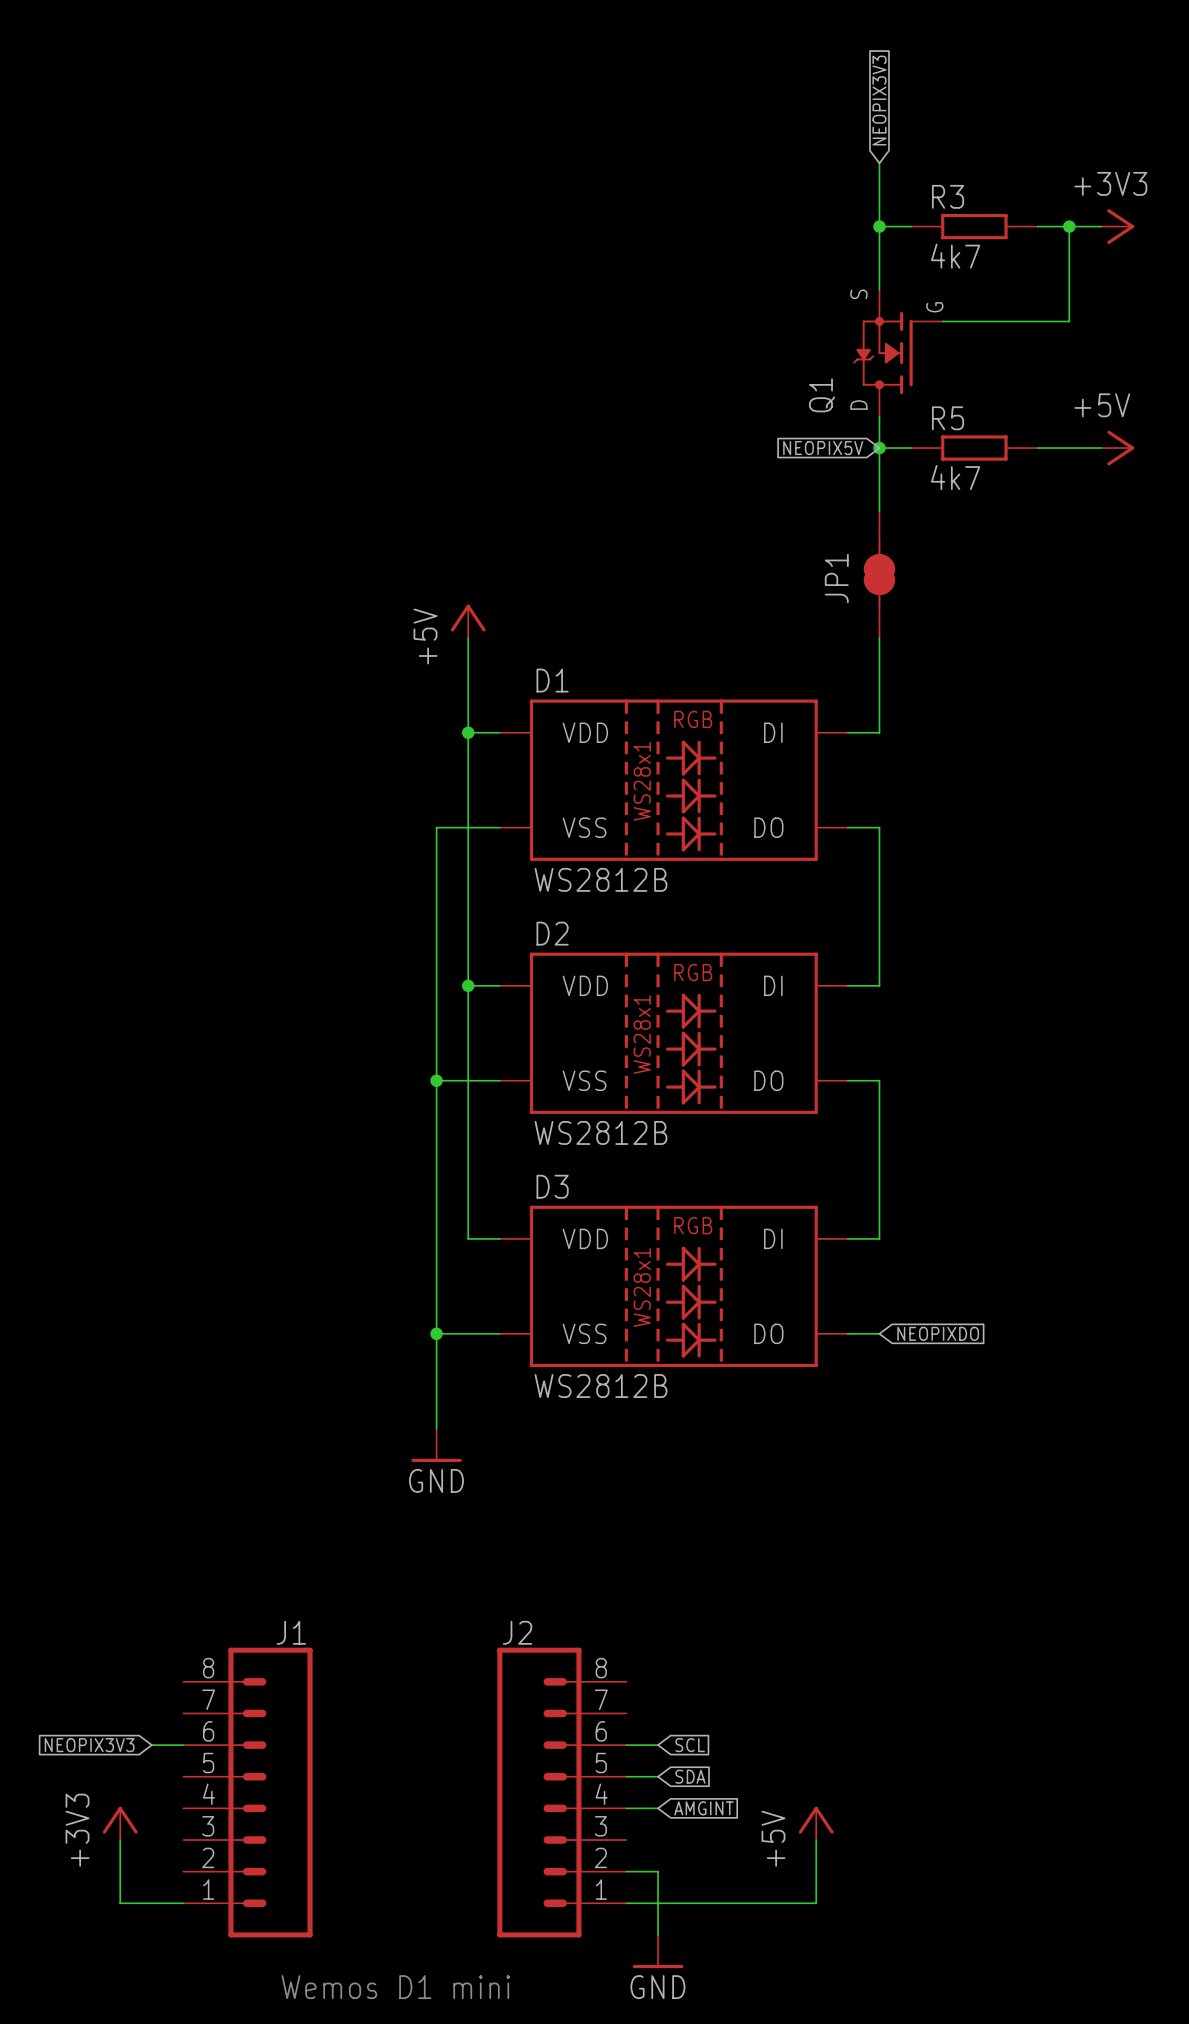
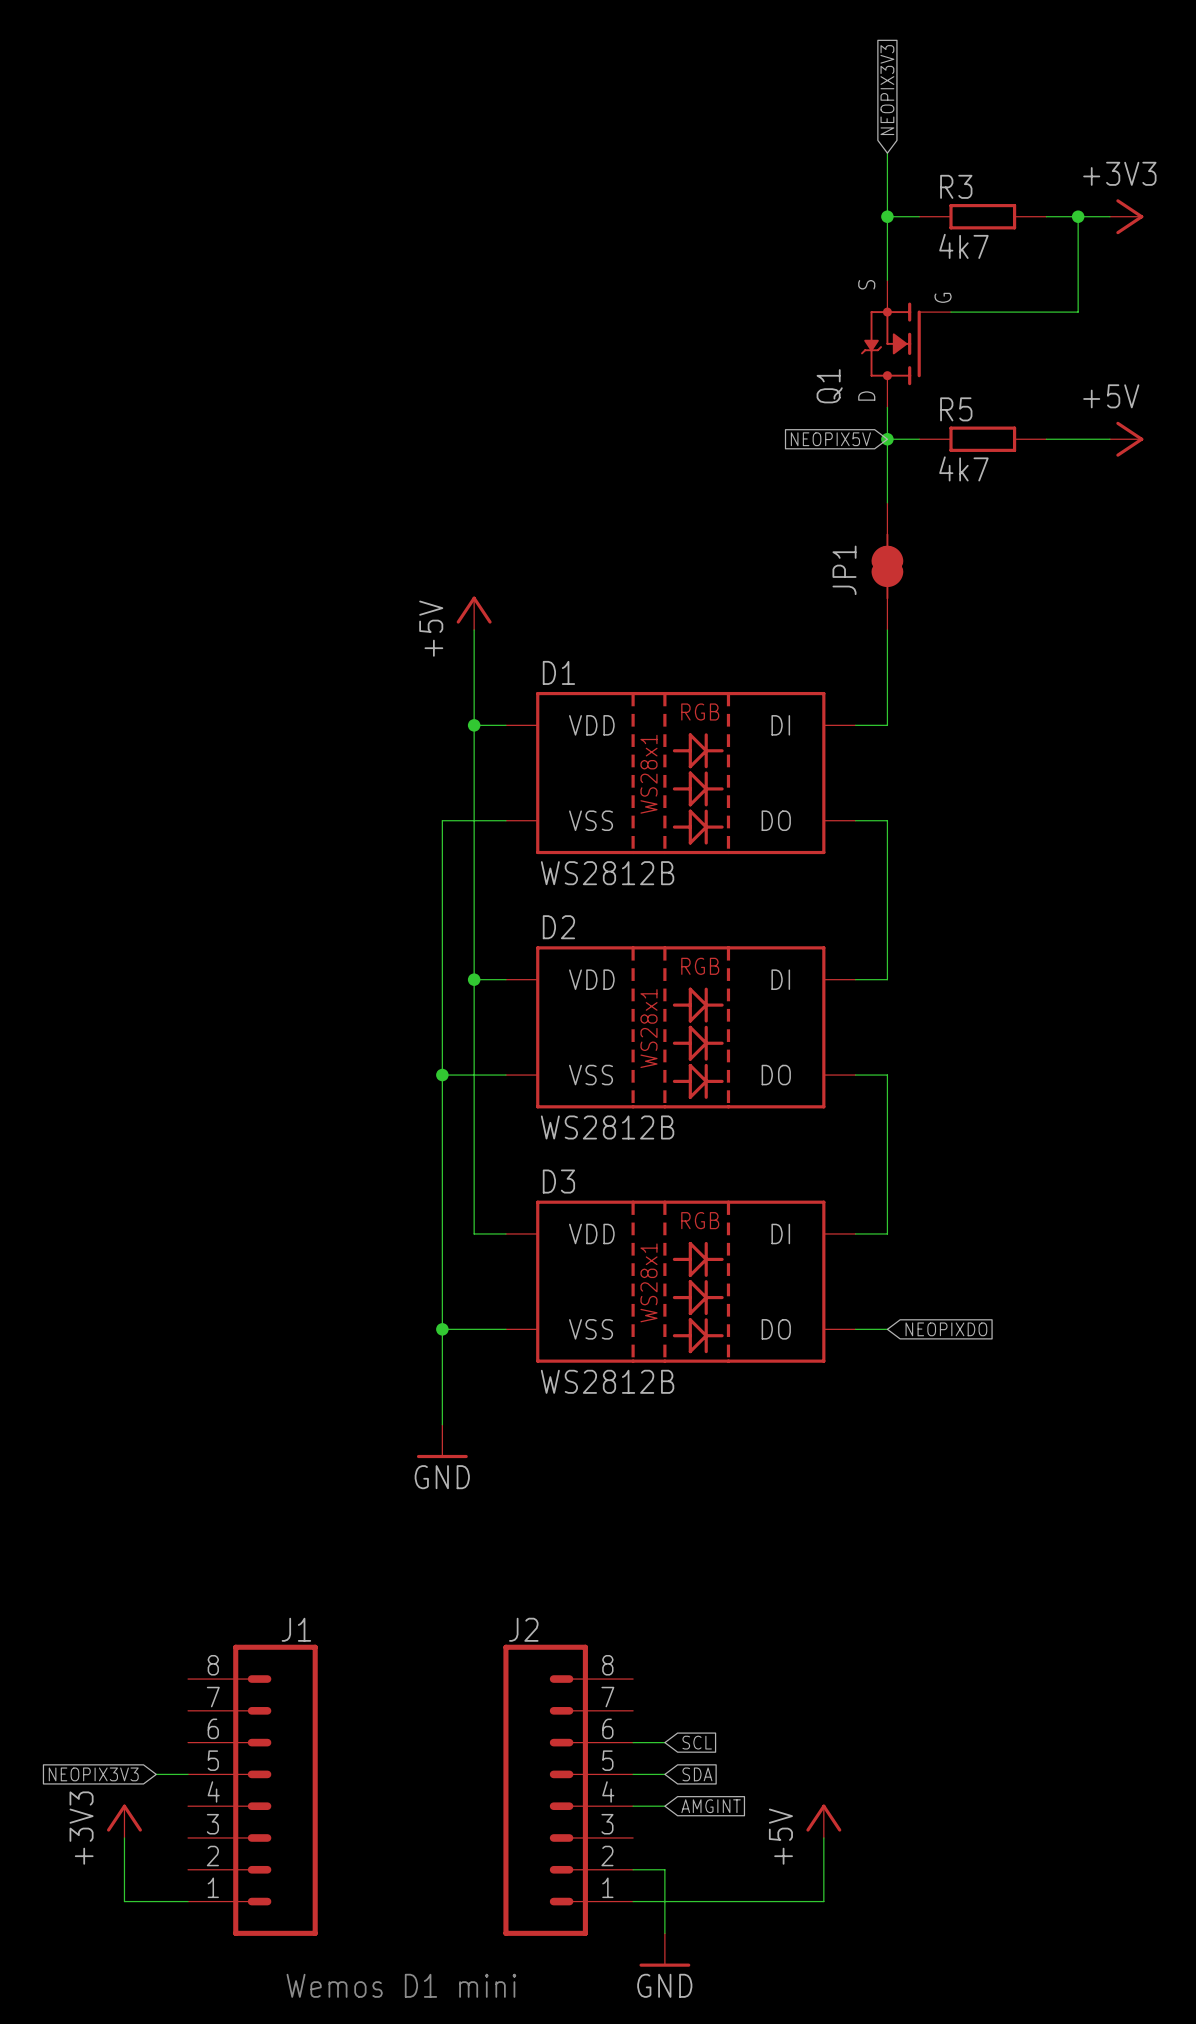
global label position: NEOPIX3V3 (89, 1745) -> NEOPIX3V3 (93, 1774)
wire: (151, 1745) (183, 1745) -> (156, 1774) (188, 1774)

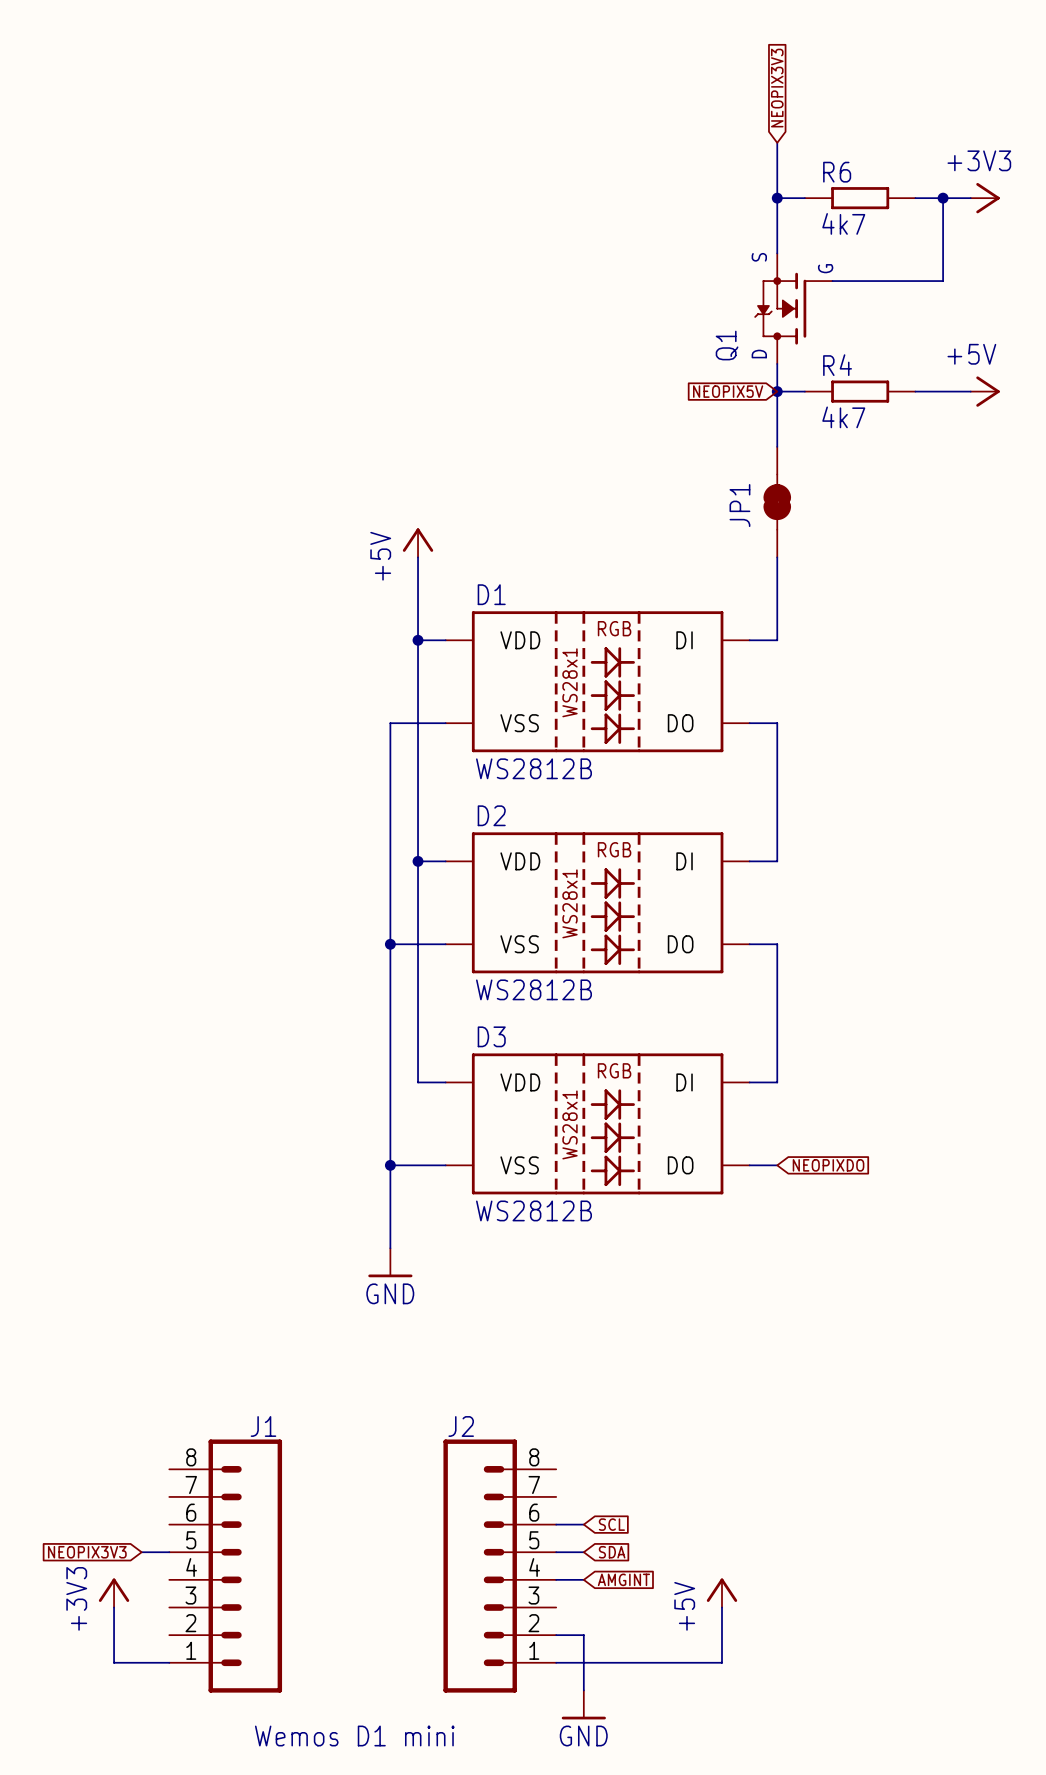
R3 name: R3 (956, 186) -> R6 (837, 172)
R5 name: R5 (956, 409) -> R4 (837, 365)

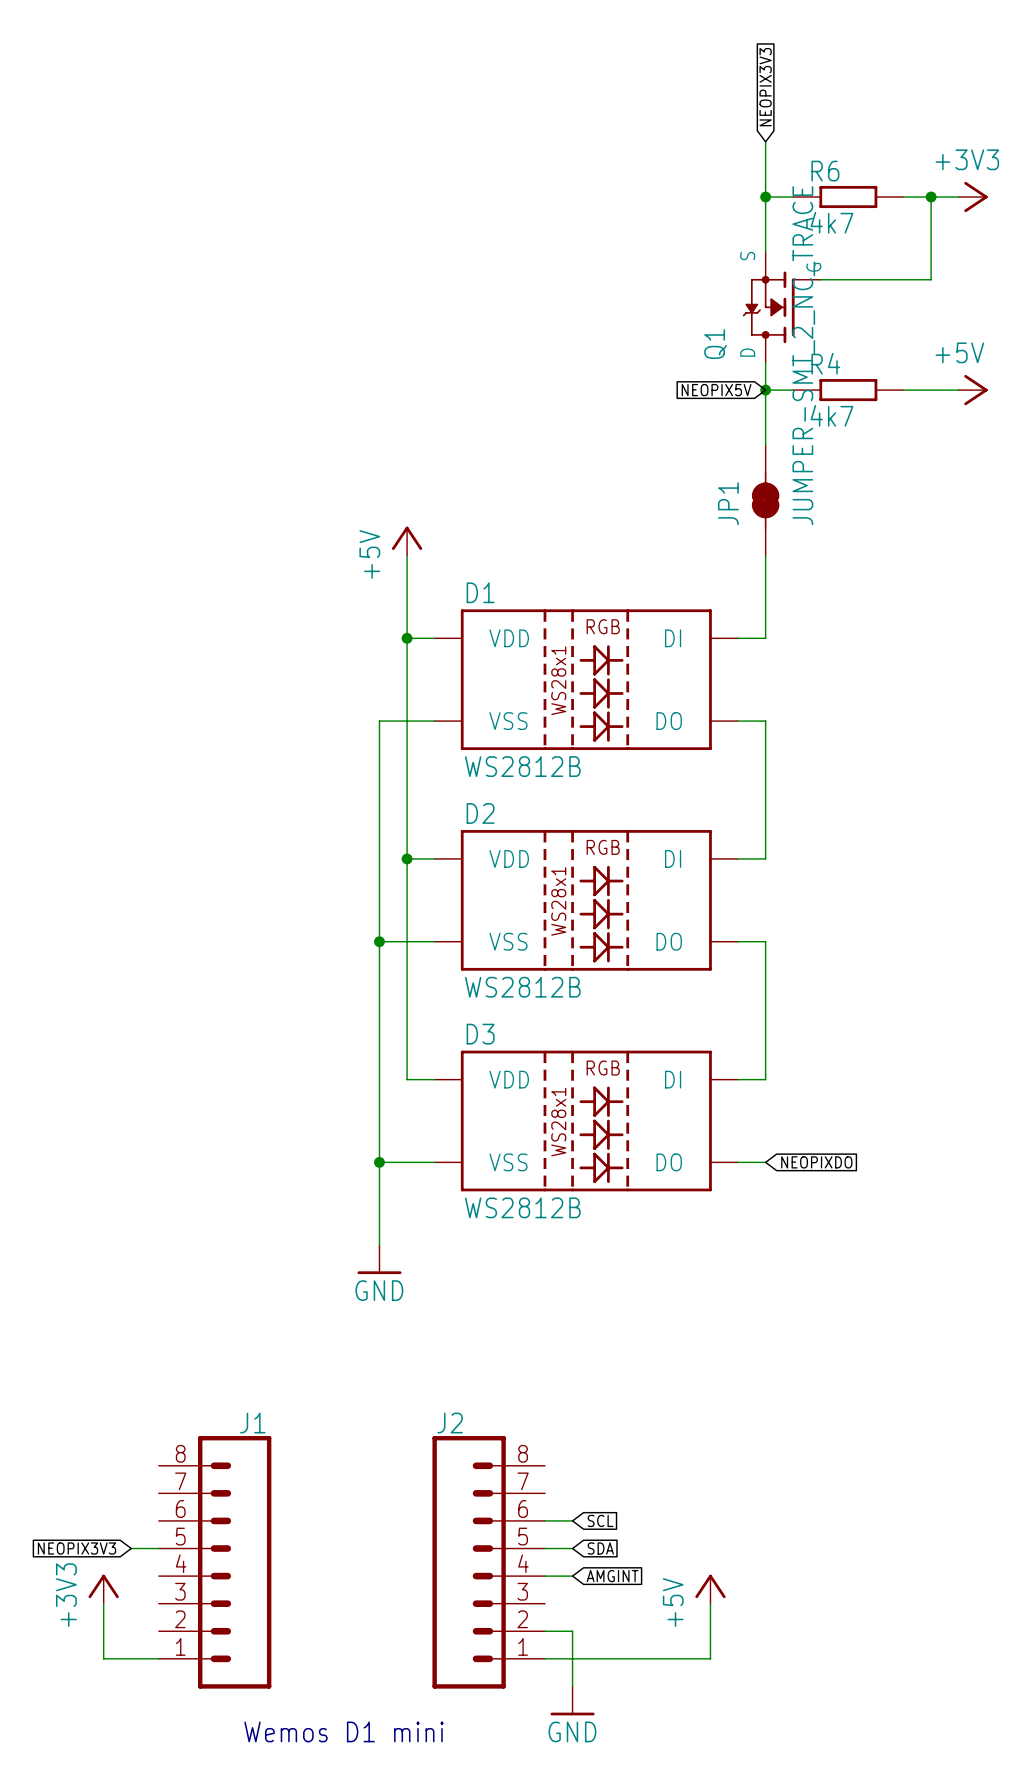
JP1 value: none -> JUMPER-SMT_2_NC_TRACE (803, 355)

